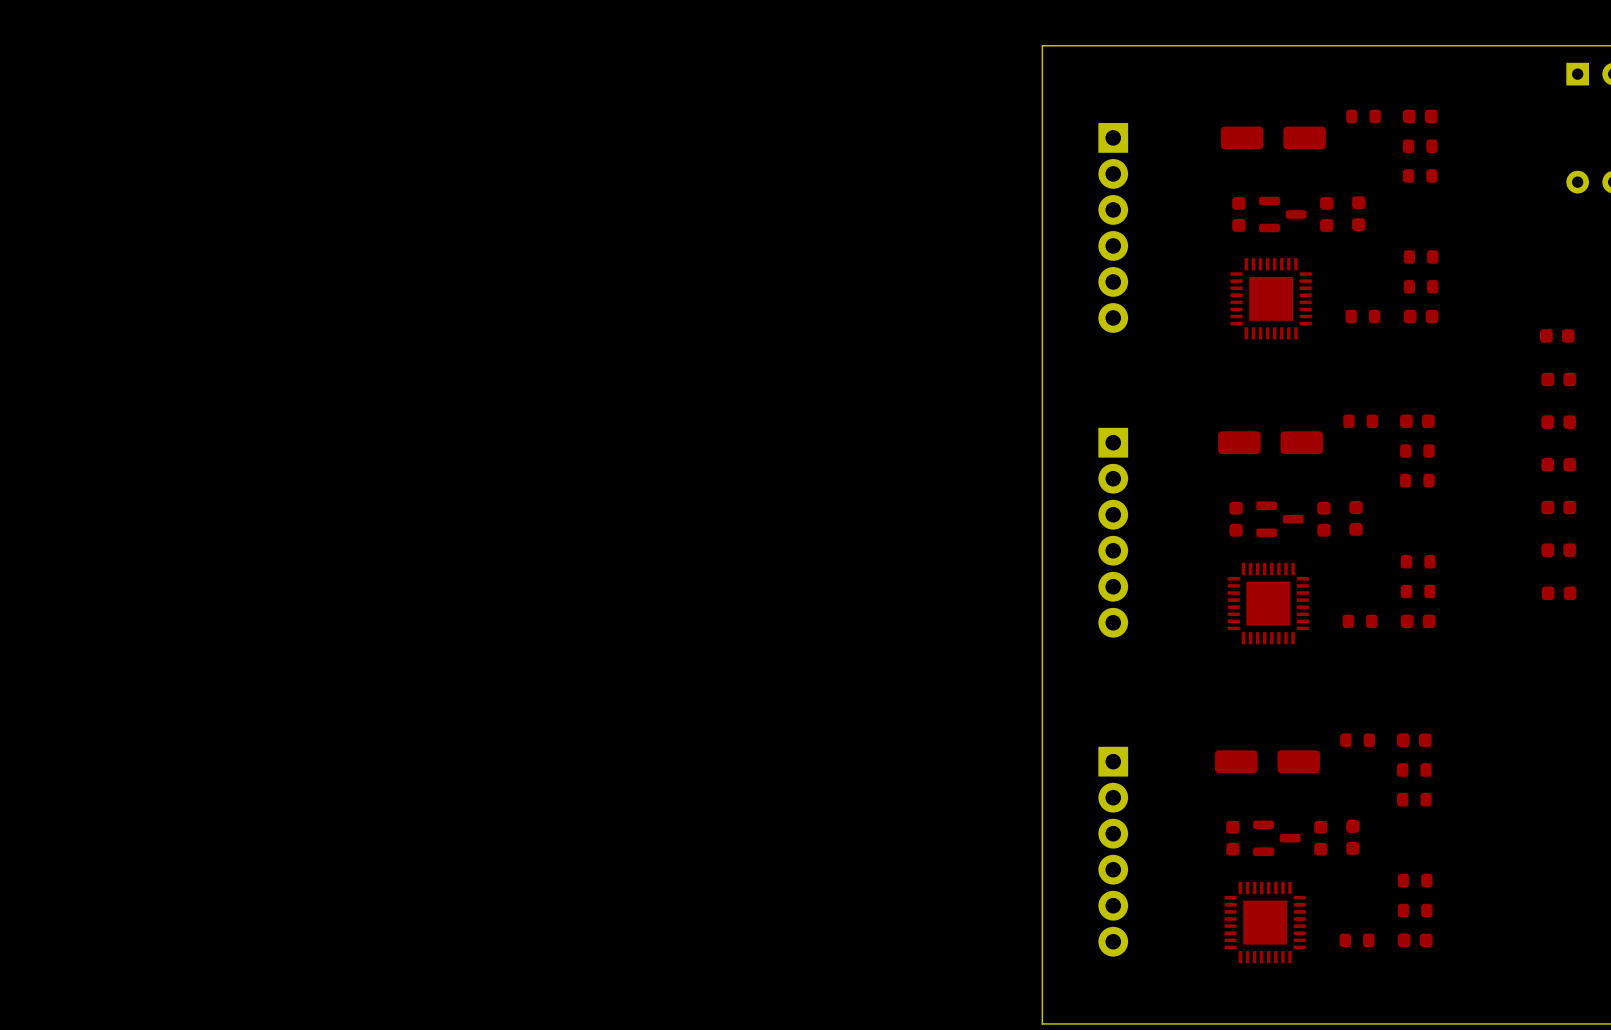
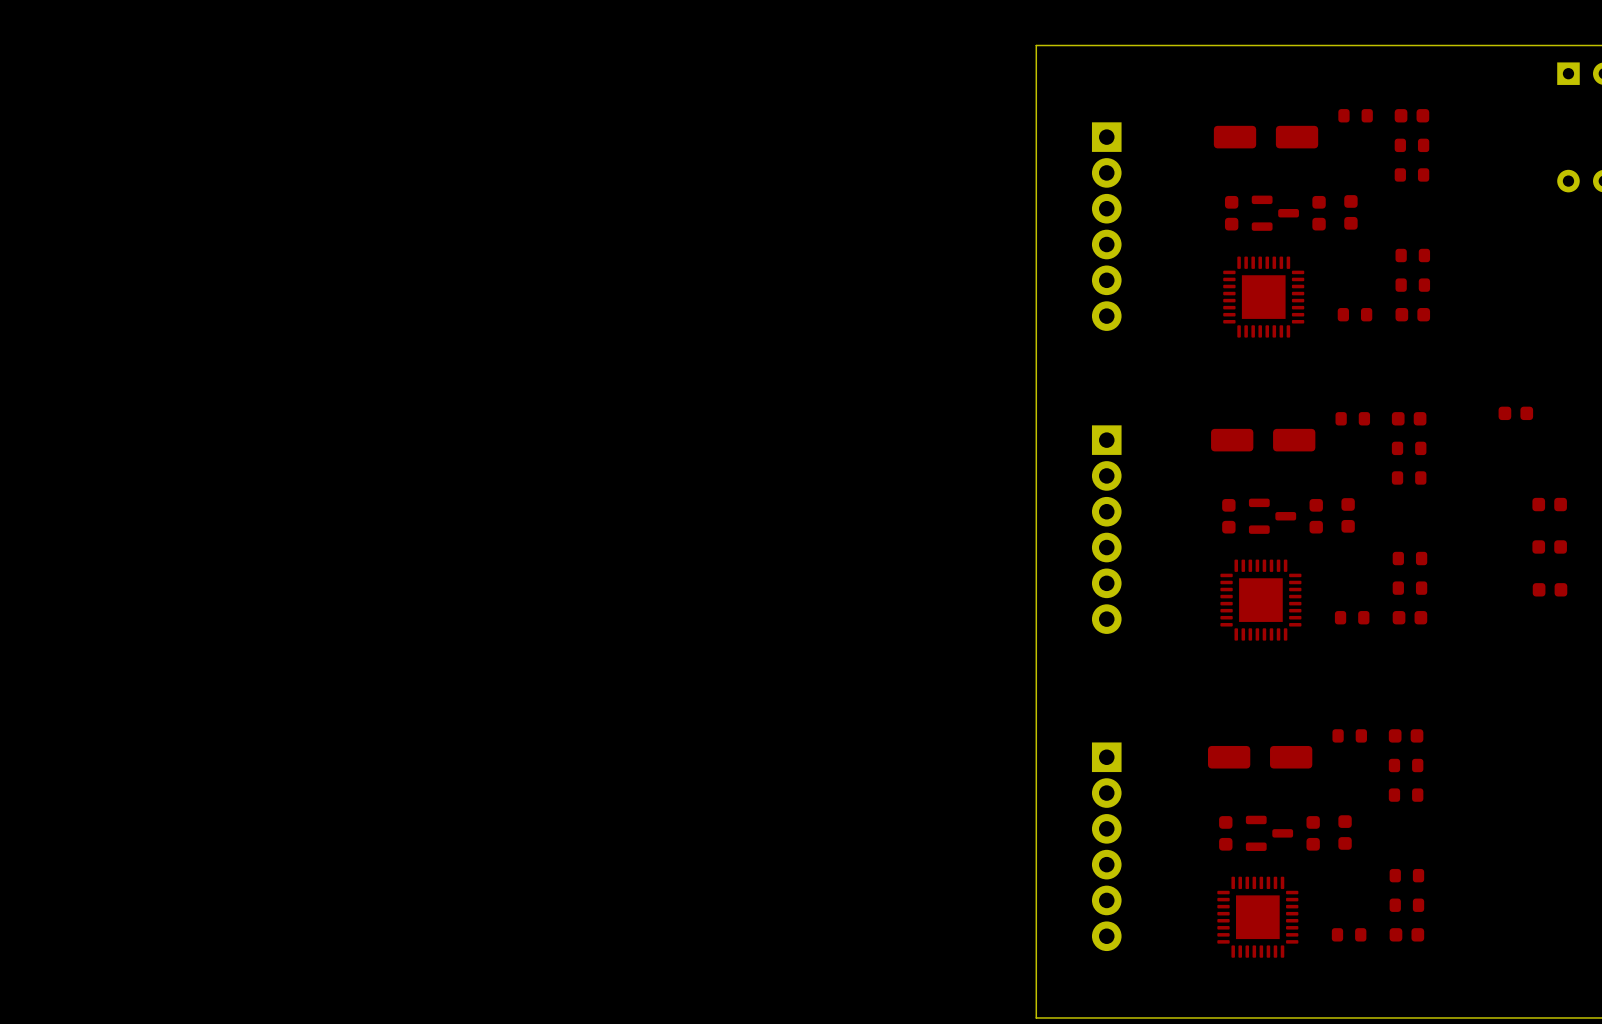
part: (1557, 335) -> none
part: (1558, 379) -> none
part: none -> (1515, 413)
part: (1558, 422) -> none
part: (1558, 464) -> none

